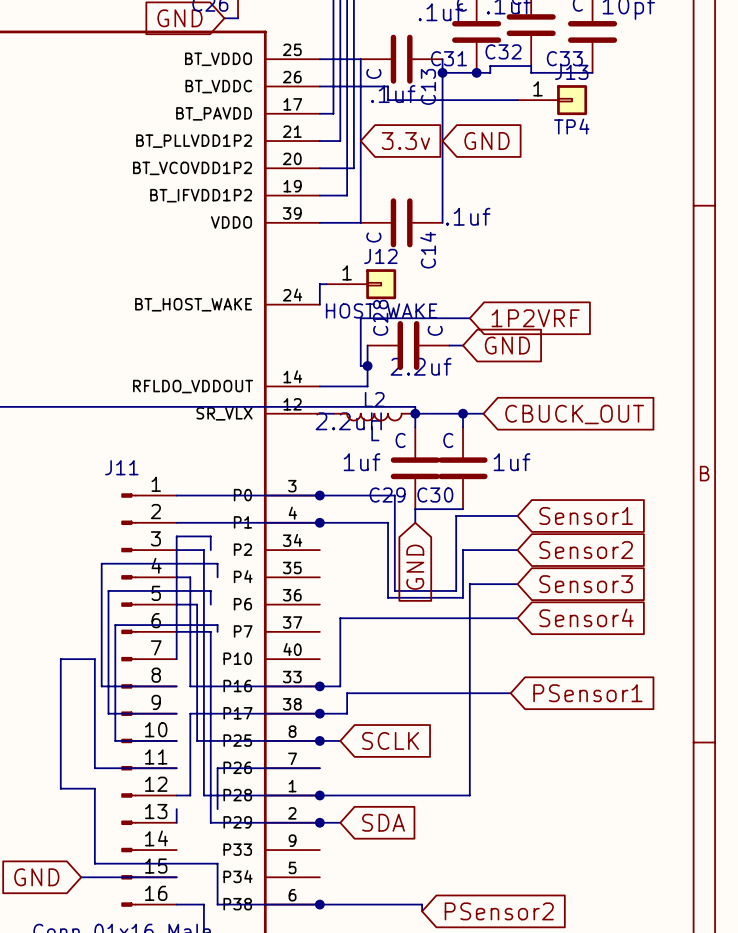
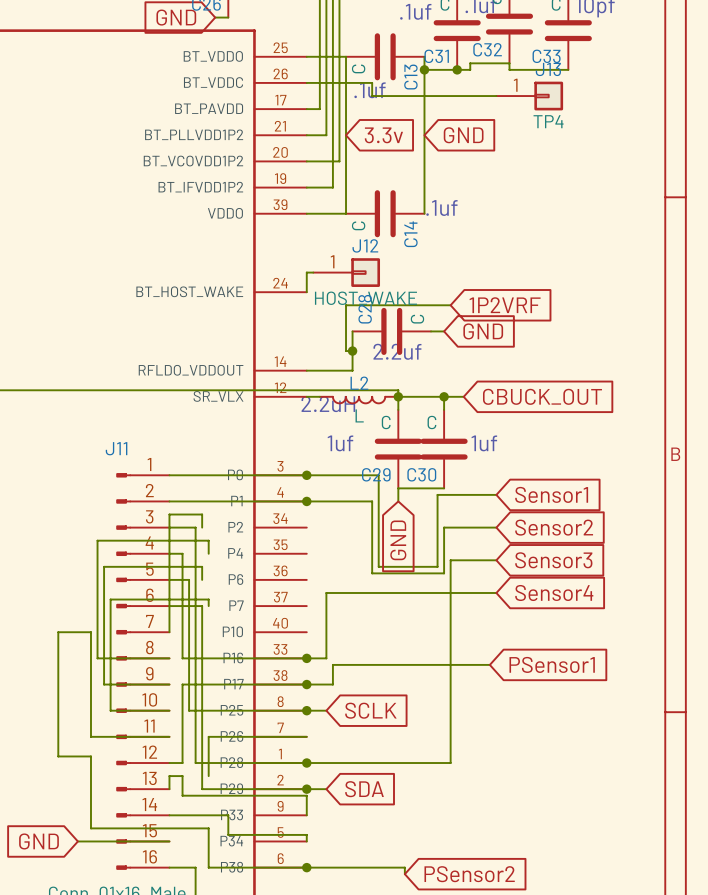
wire: none -> (169, 776) (182, 776) (182, 795) (306, 795) (306, 815)
wire: none -> (169, 815) (228, 815) (228, 834) (306, 834) (306, 841)

